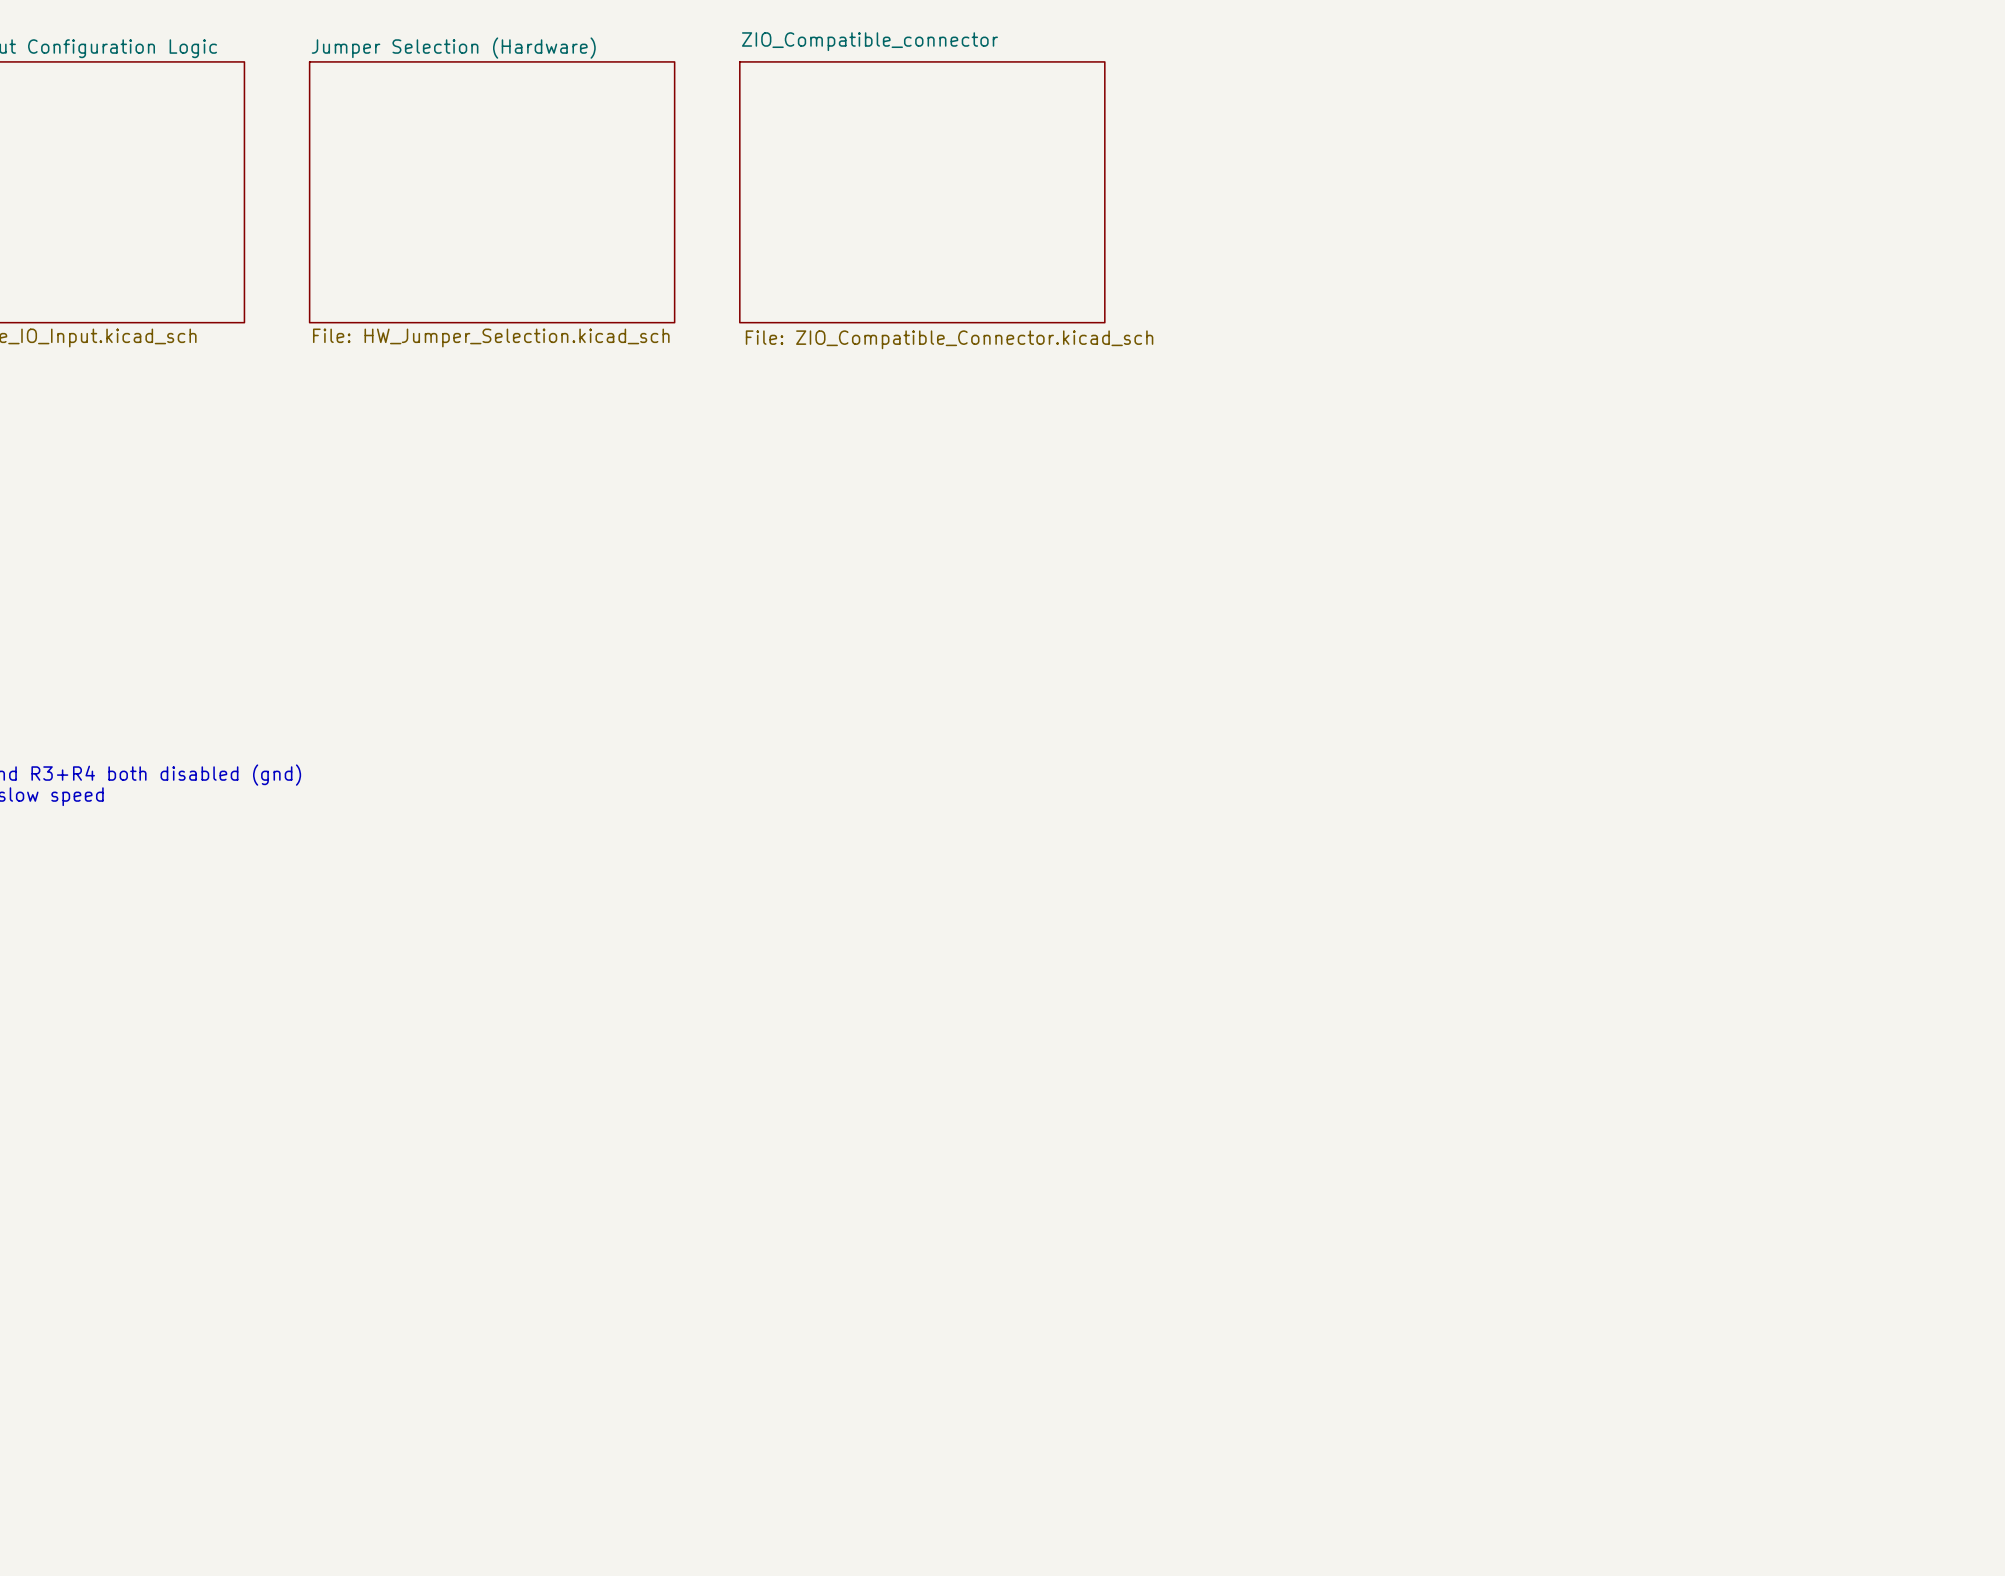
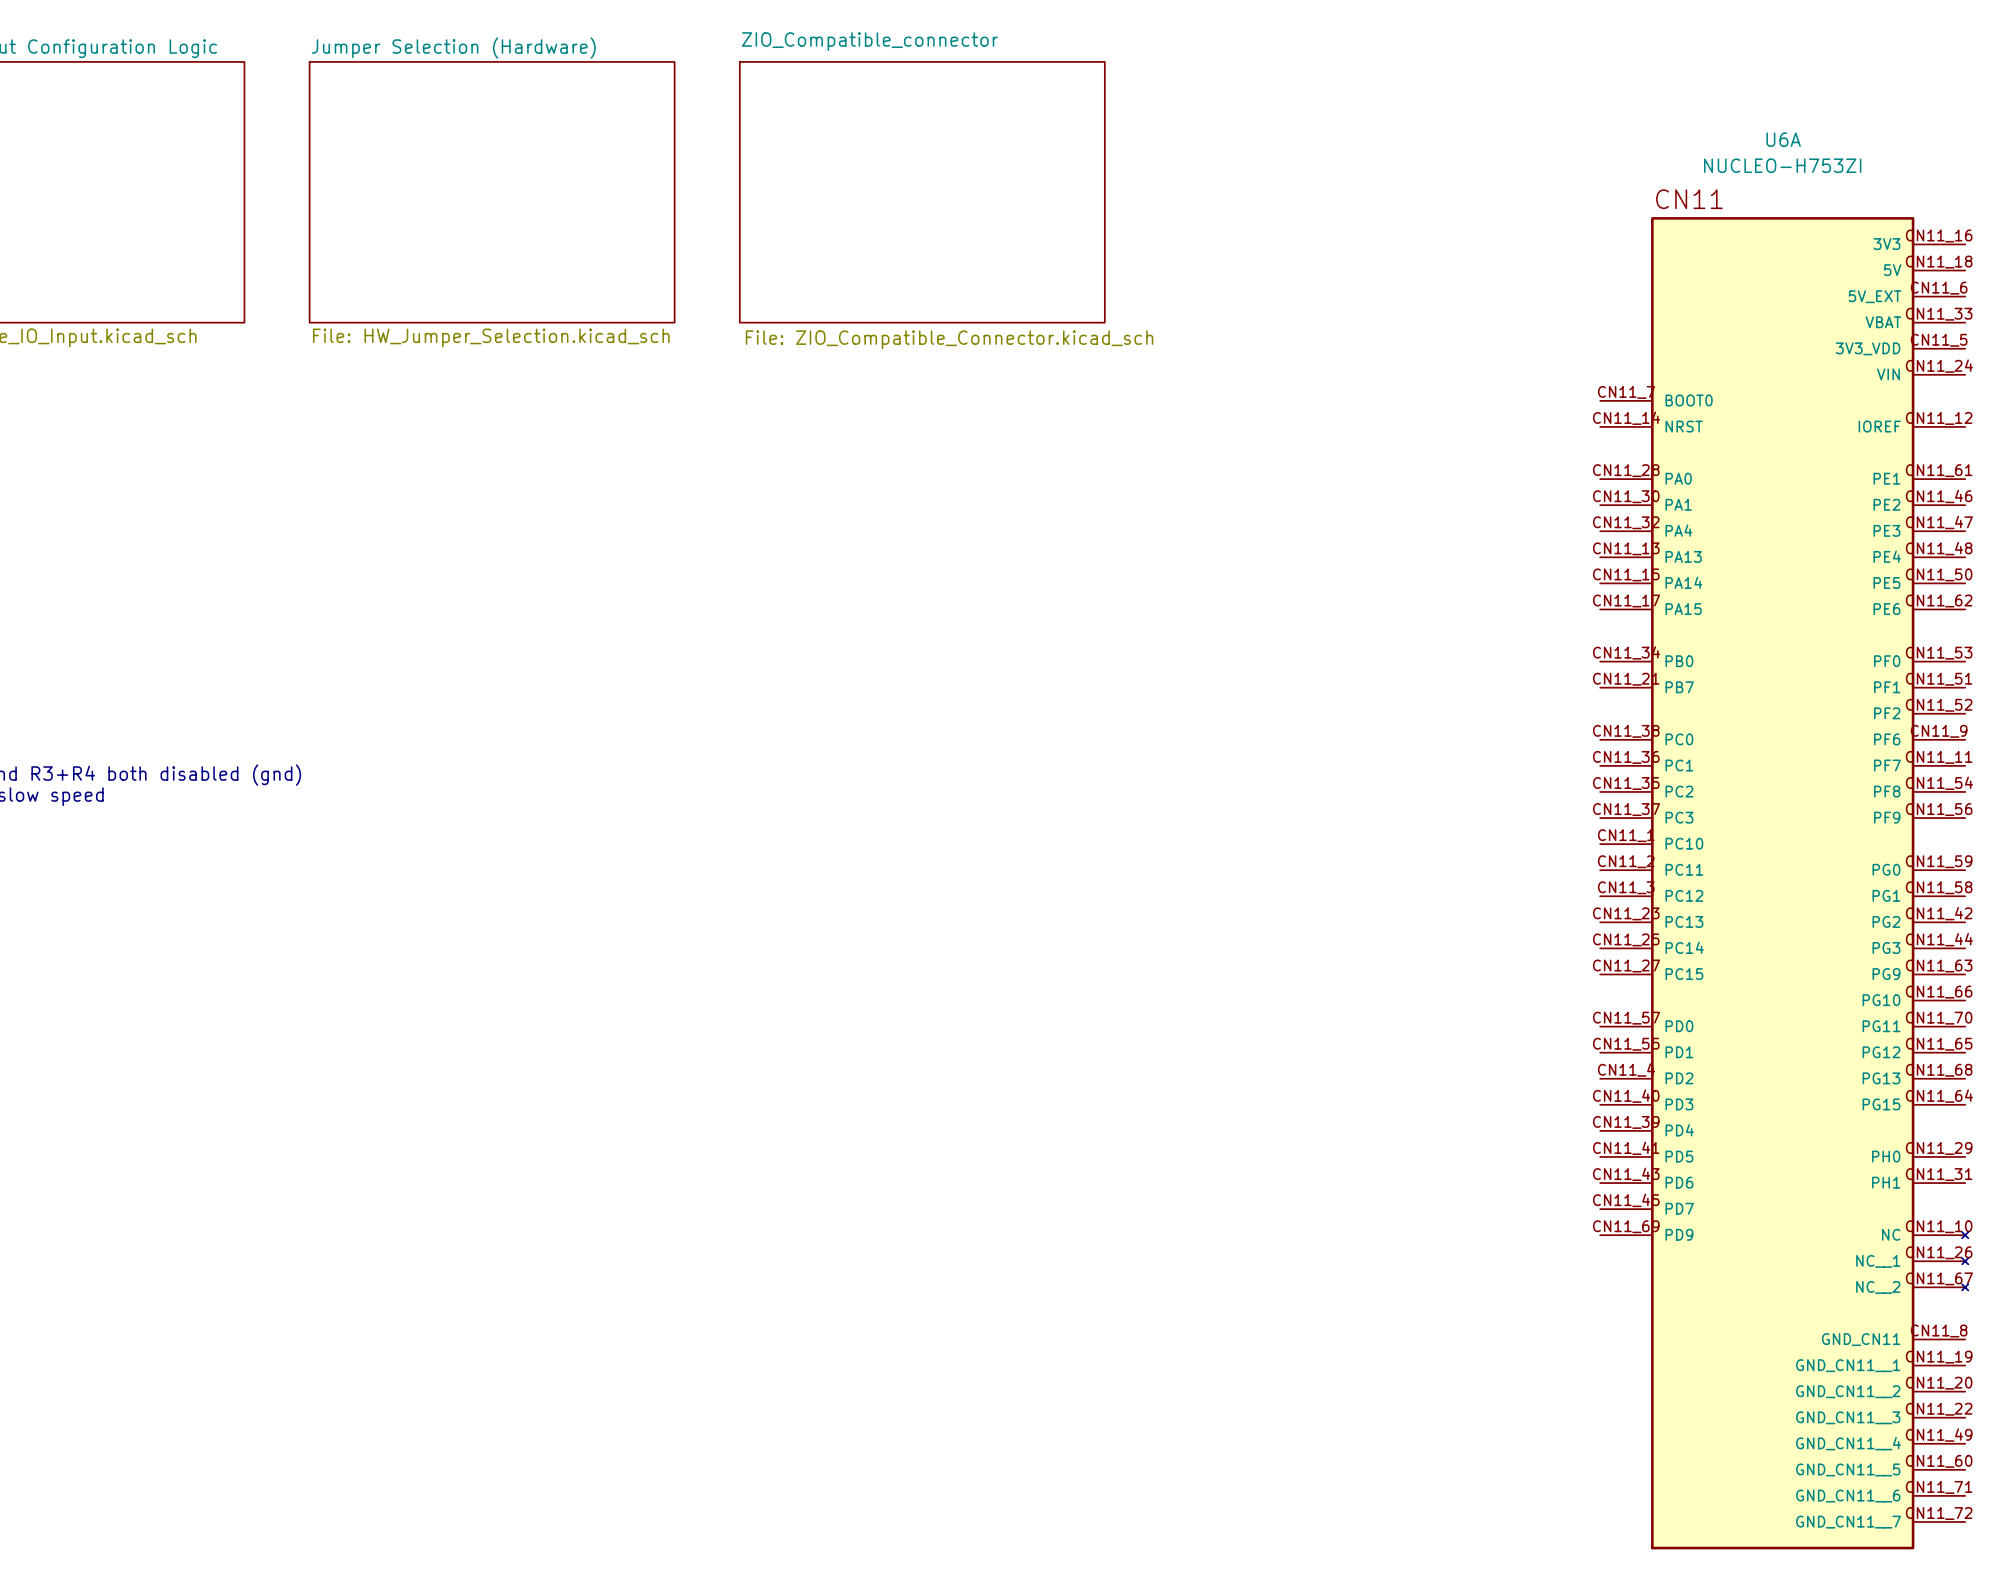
U6A: none -> NUCLEO-H753ZI (1784, 883)

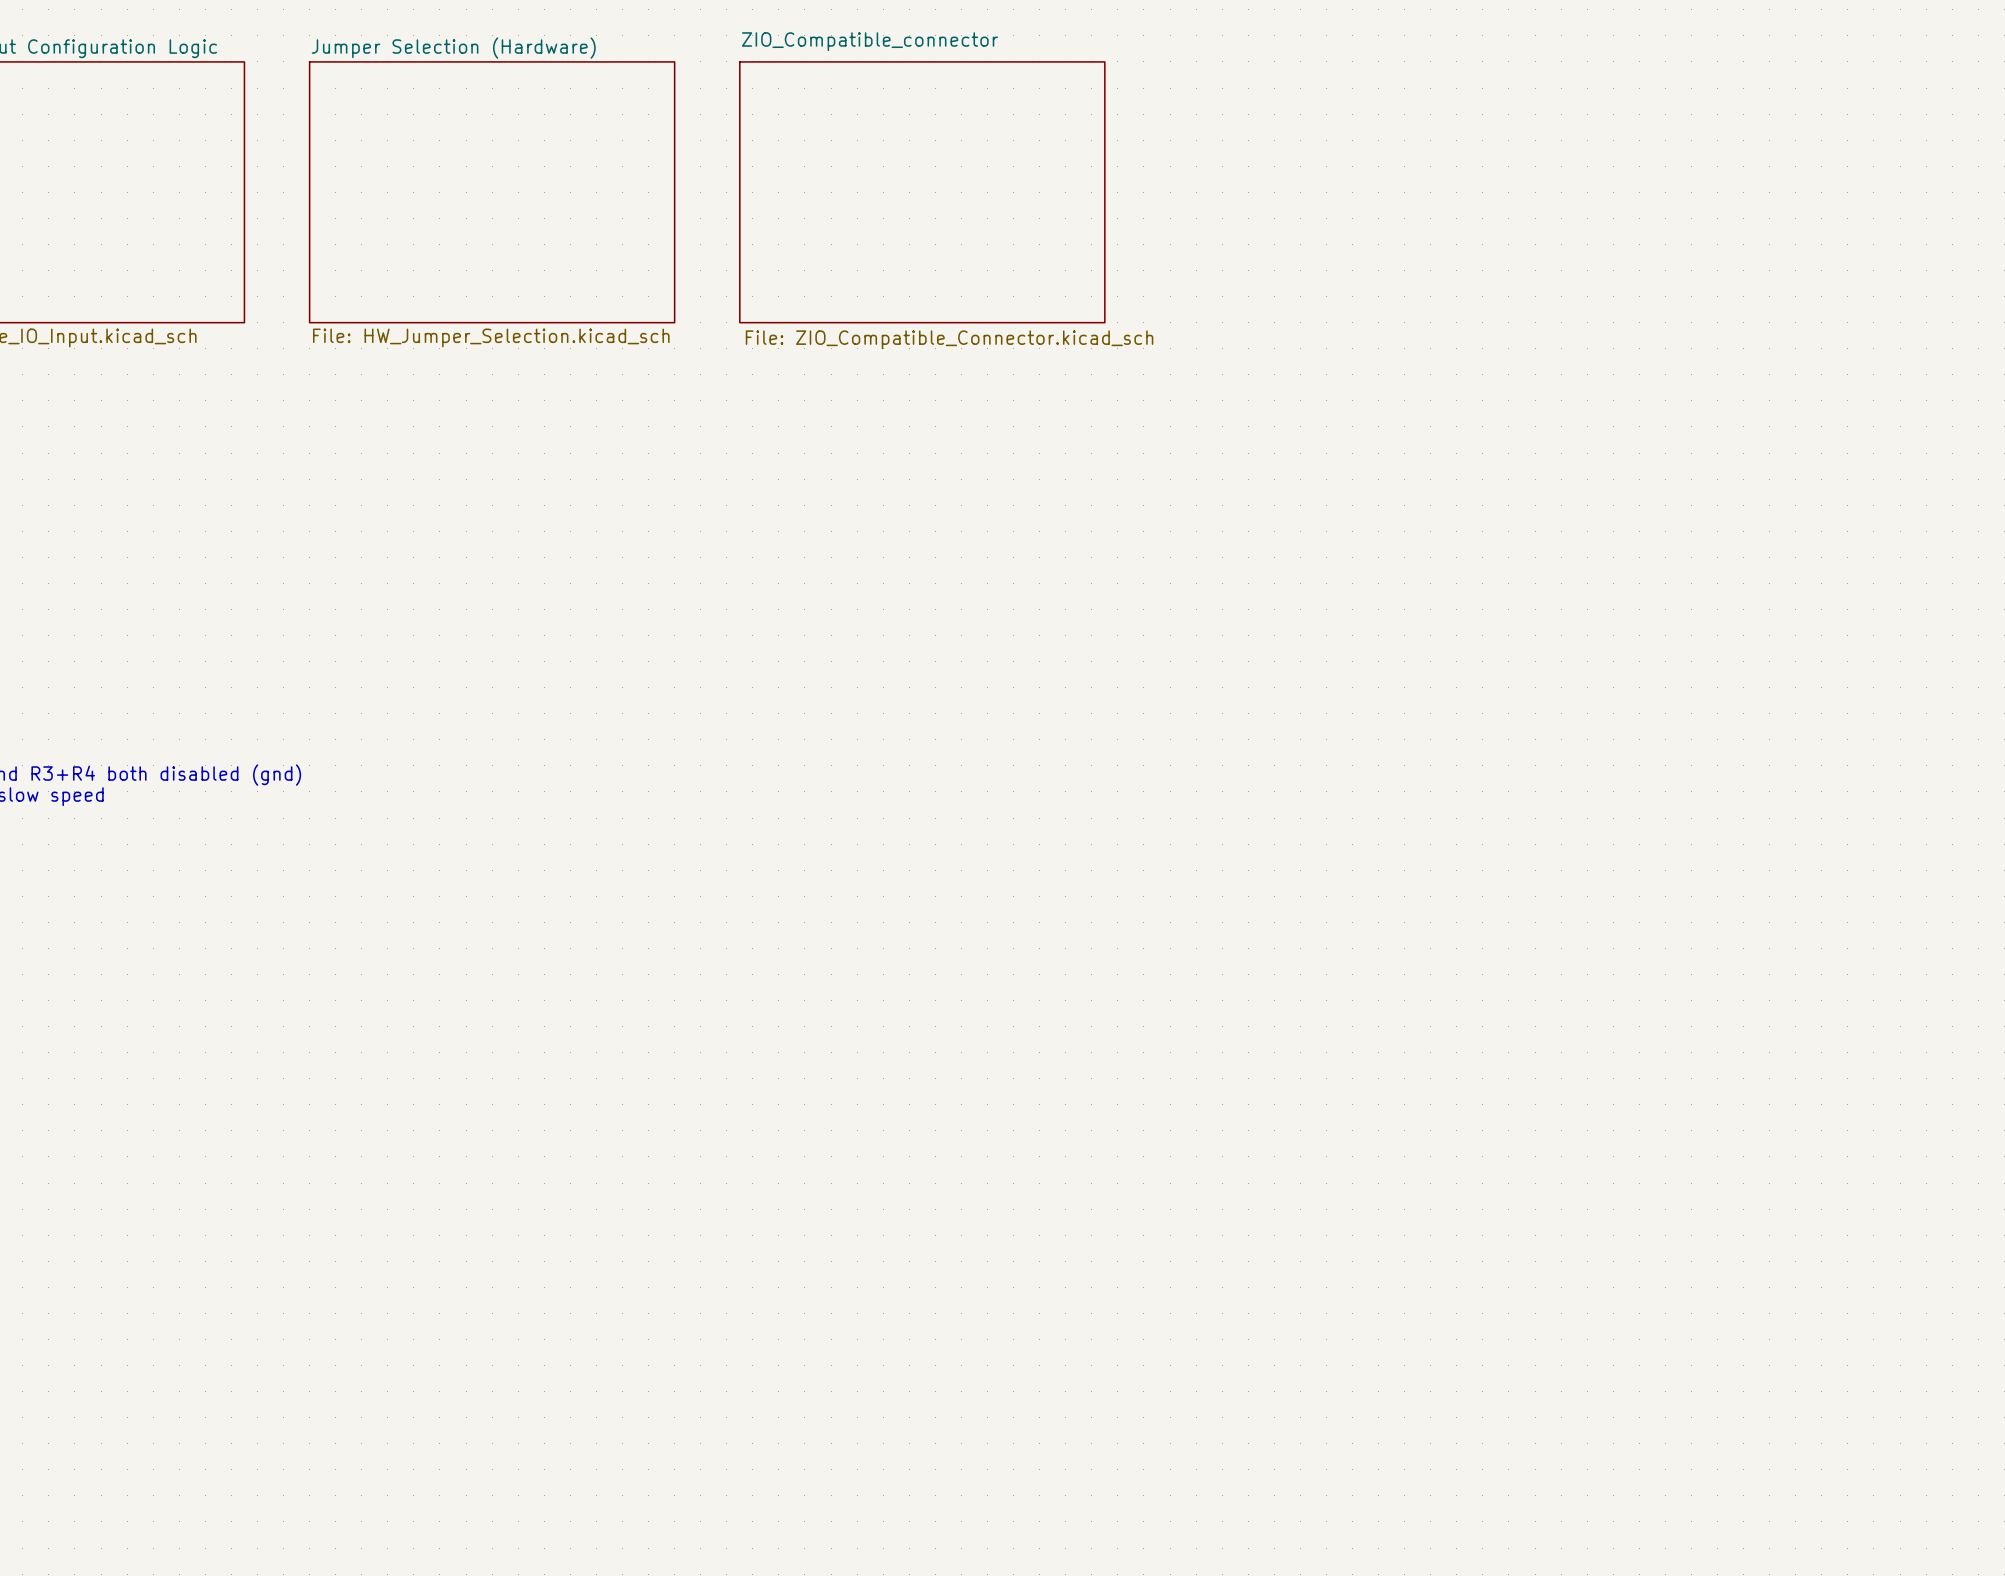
U6A: NUCLEO-H753ZI (1784, 883) -> none

